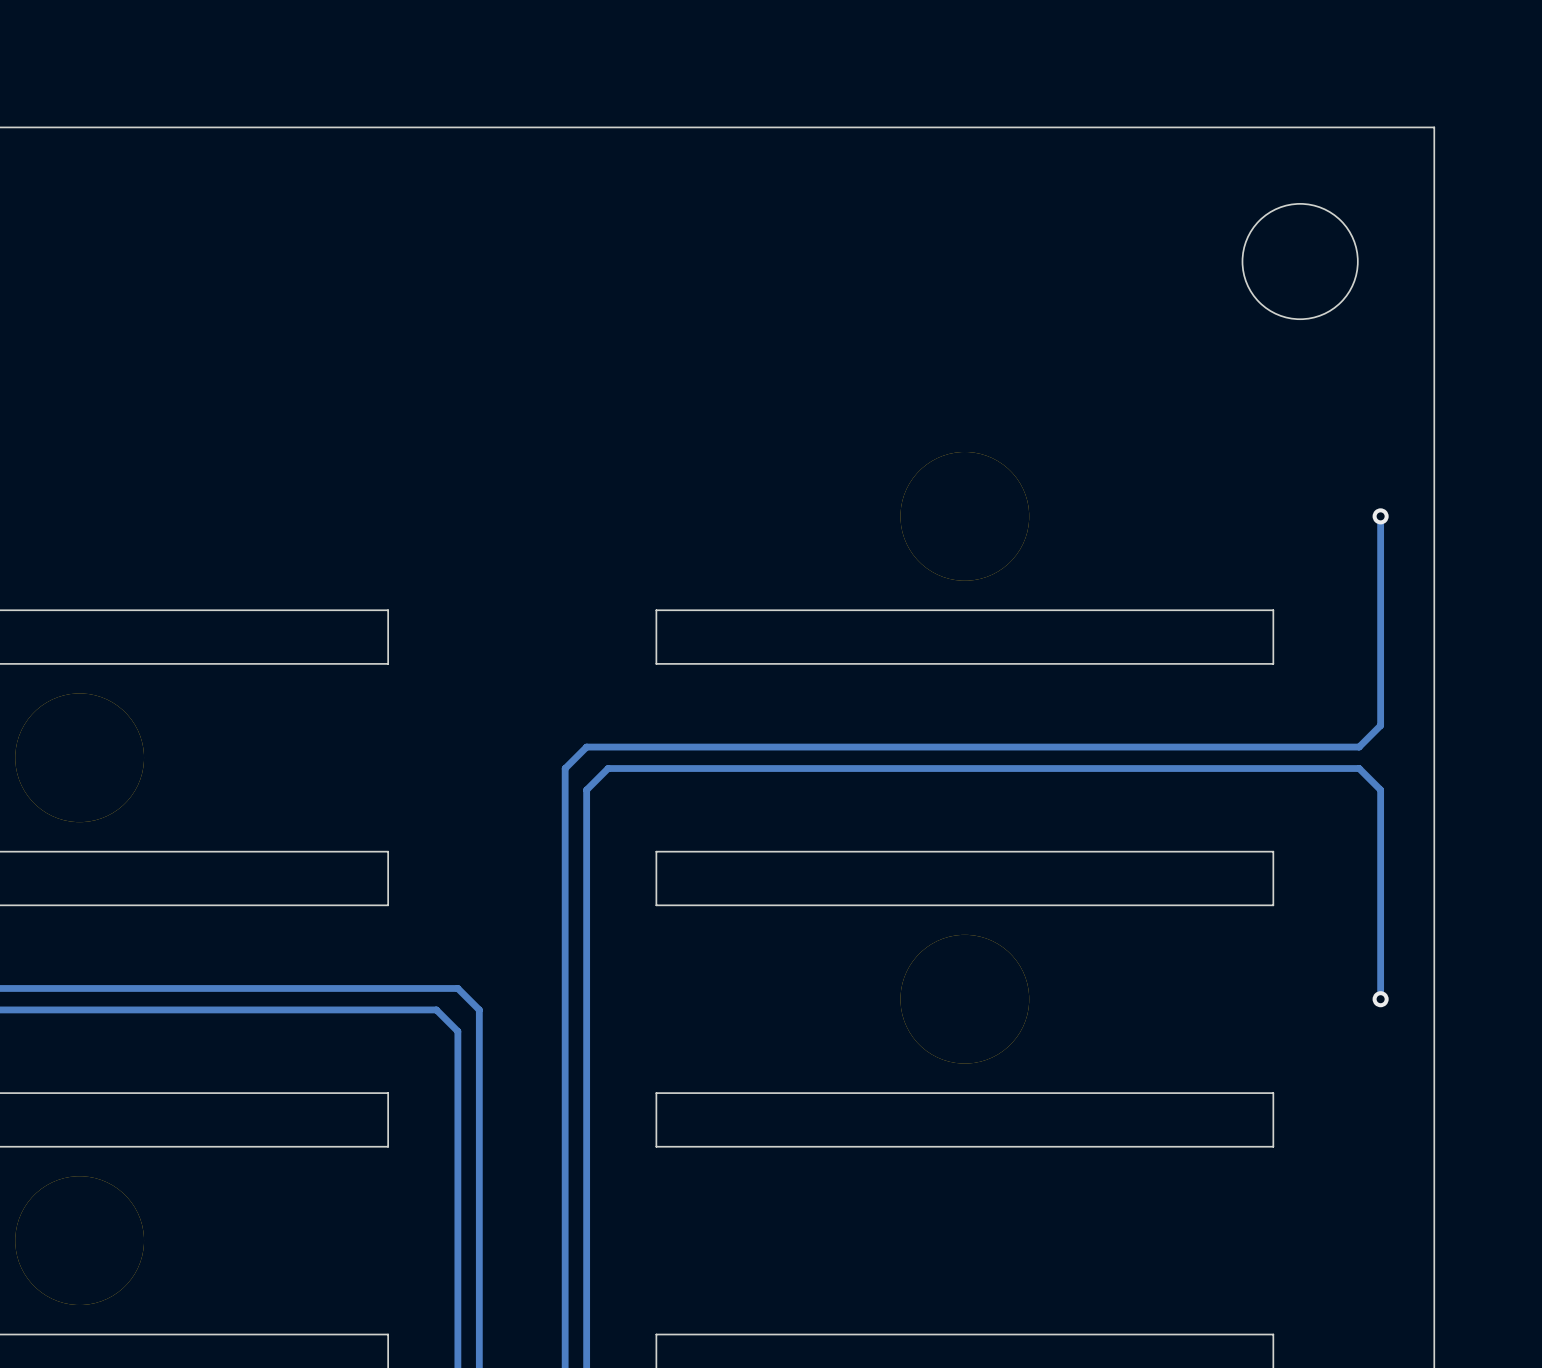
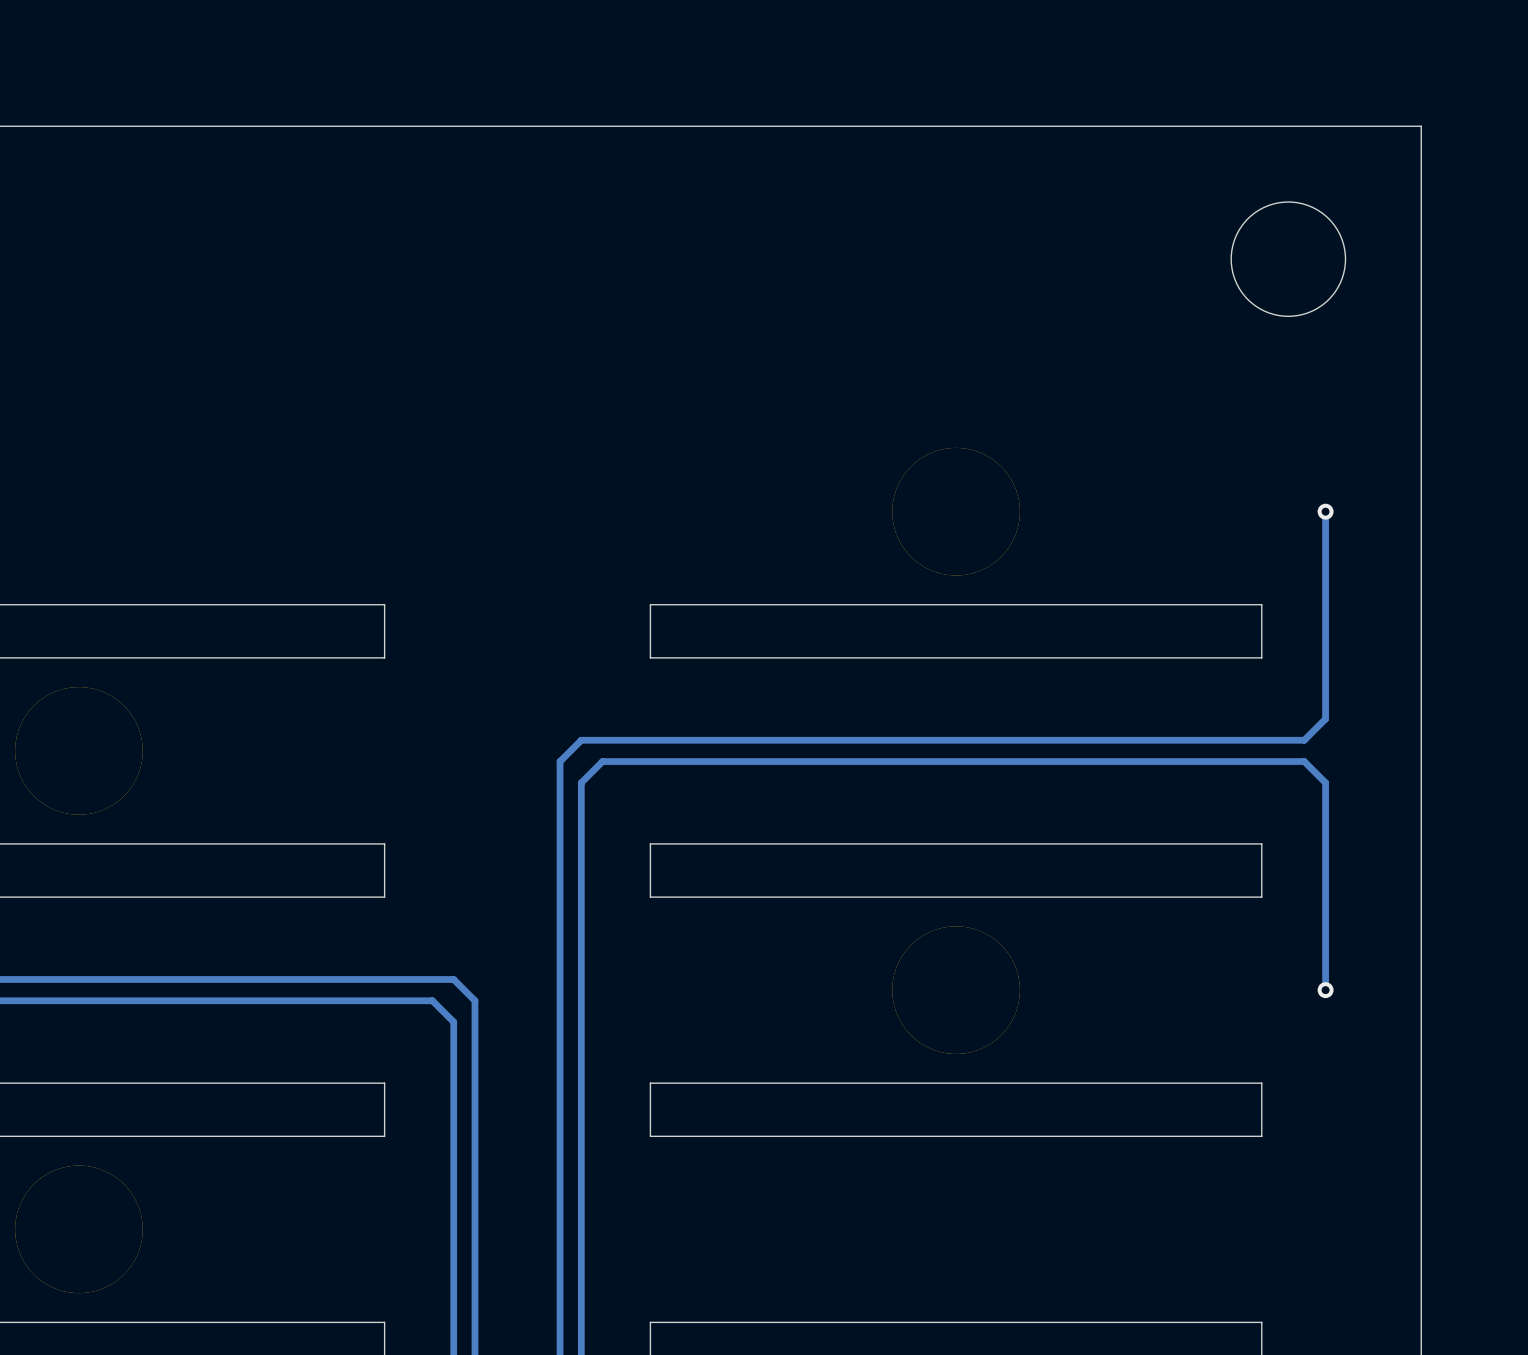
track: (1380, 516) (1380, 725) (1359, 747) (1316, 747) -> (1325, 511) (1325, 718) (1304, 740)
via position: (1380, 516) -> (1325, 511)
track: (1316, 768) (1359, 768) (1380, 789) (1380, 999) -> (1304, 761) (1325, 782) (1325, 990)
via position: (1380, 999) -> (1325, 990)

